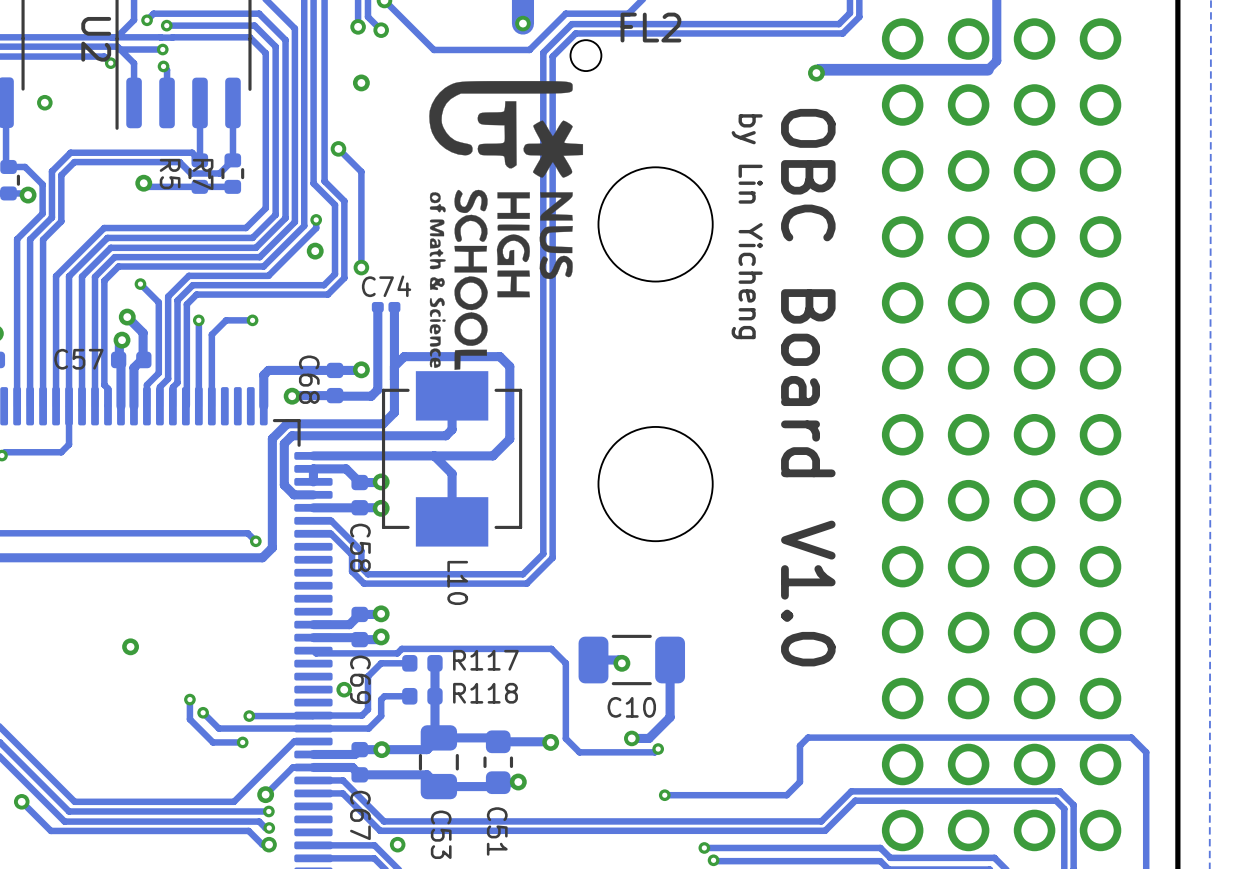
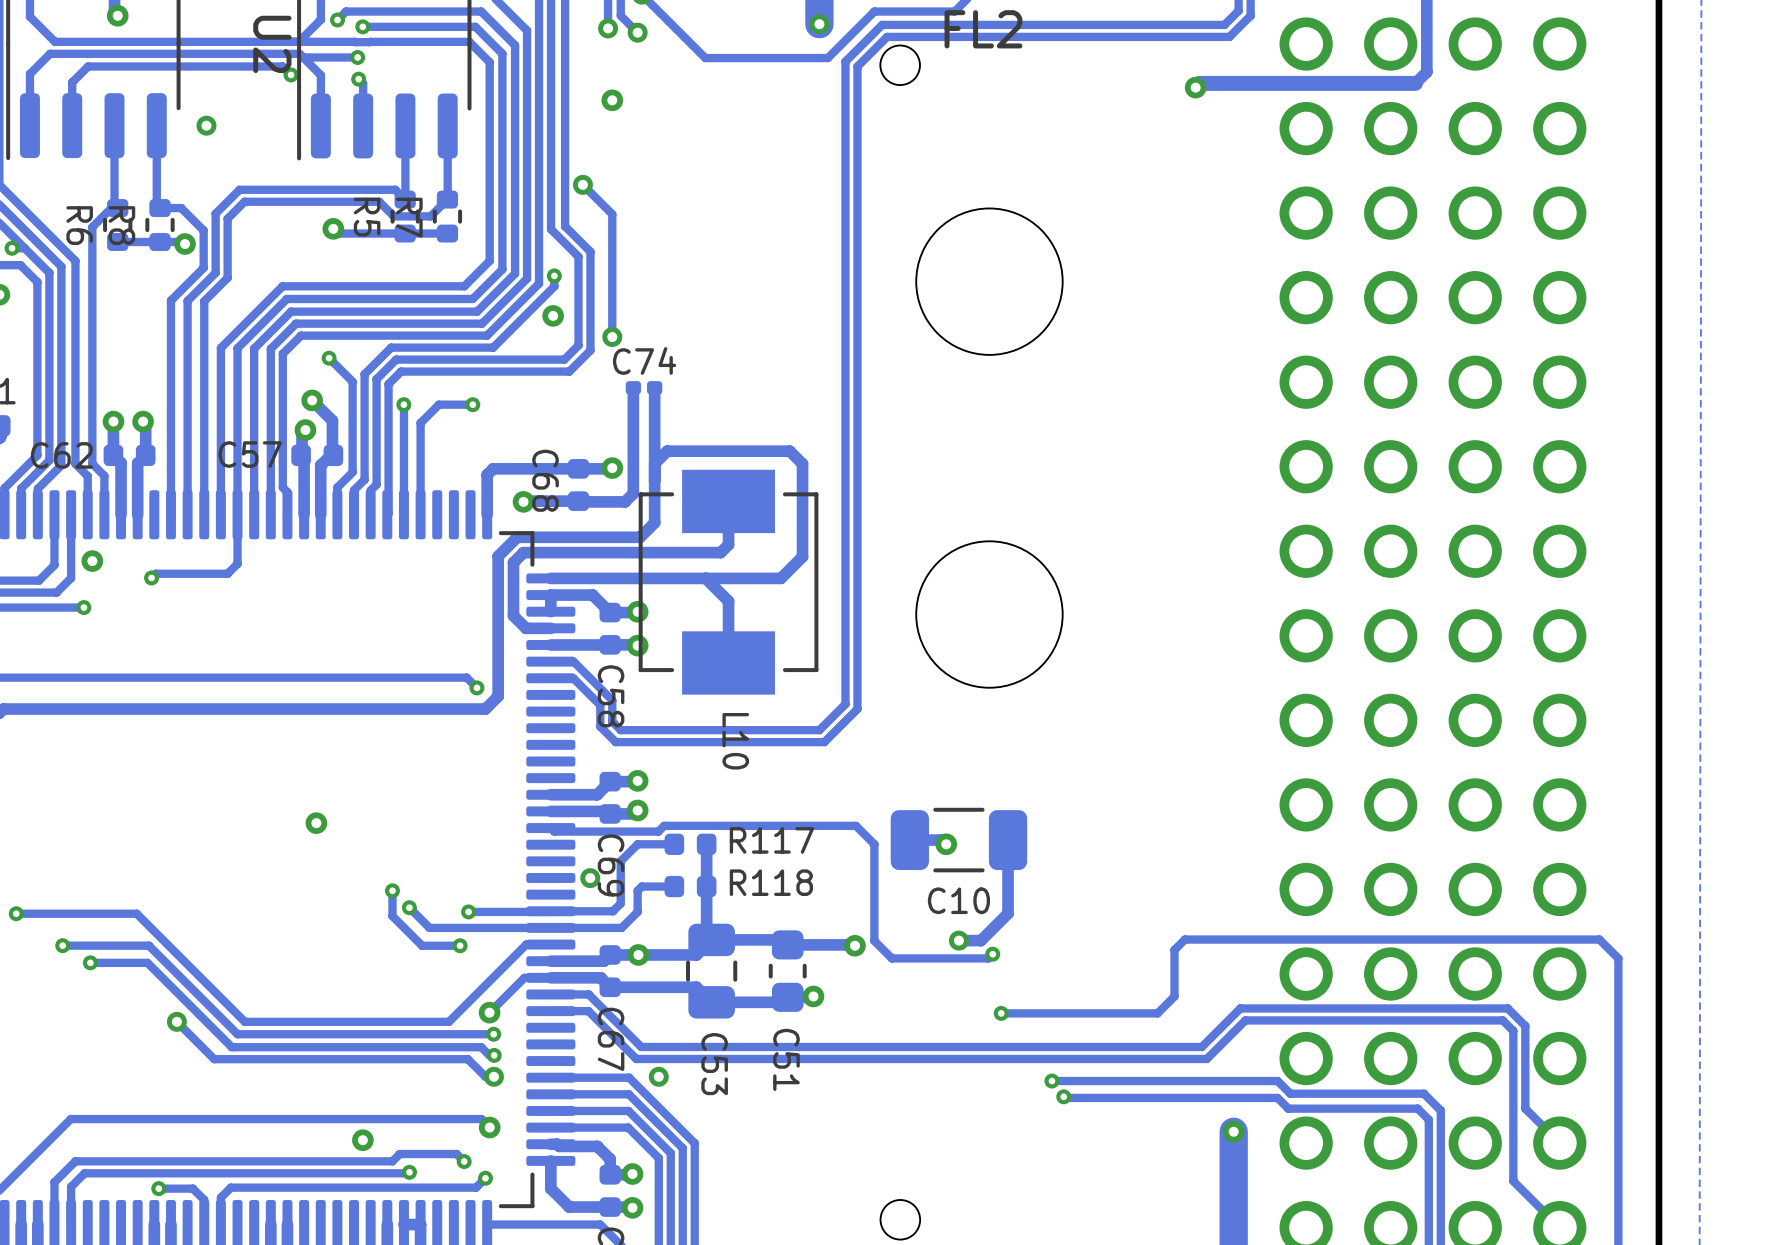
drawing: [429, 80, 584, 370] -> none
text: by Lin Yicheng (747, 226) -> none
text: OBC Board V1.0 (808, 387) -> none

